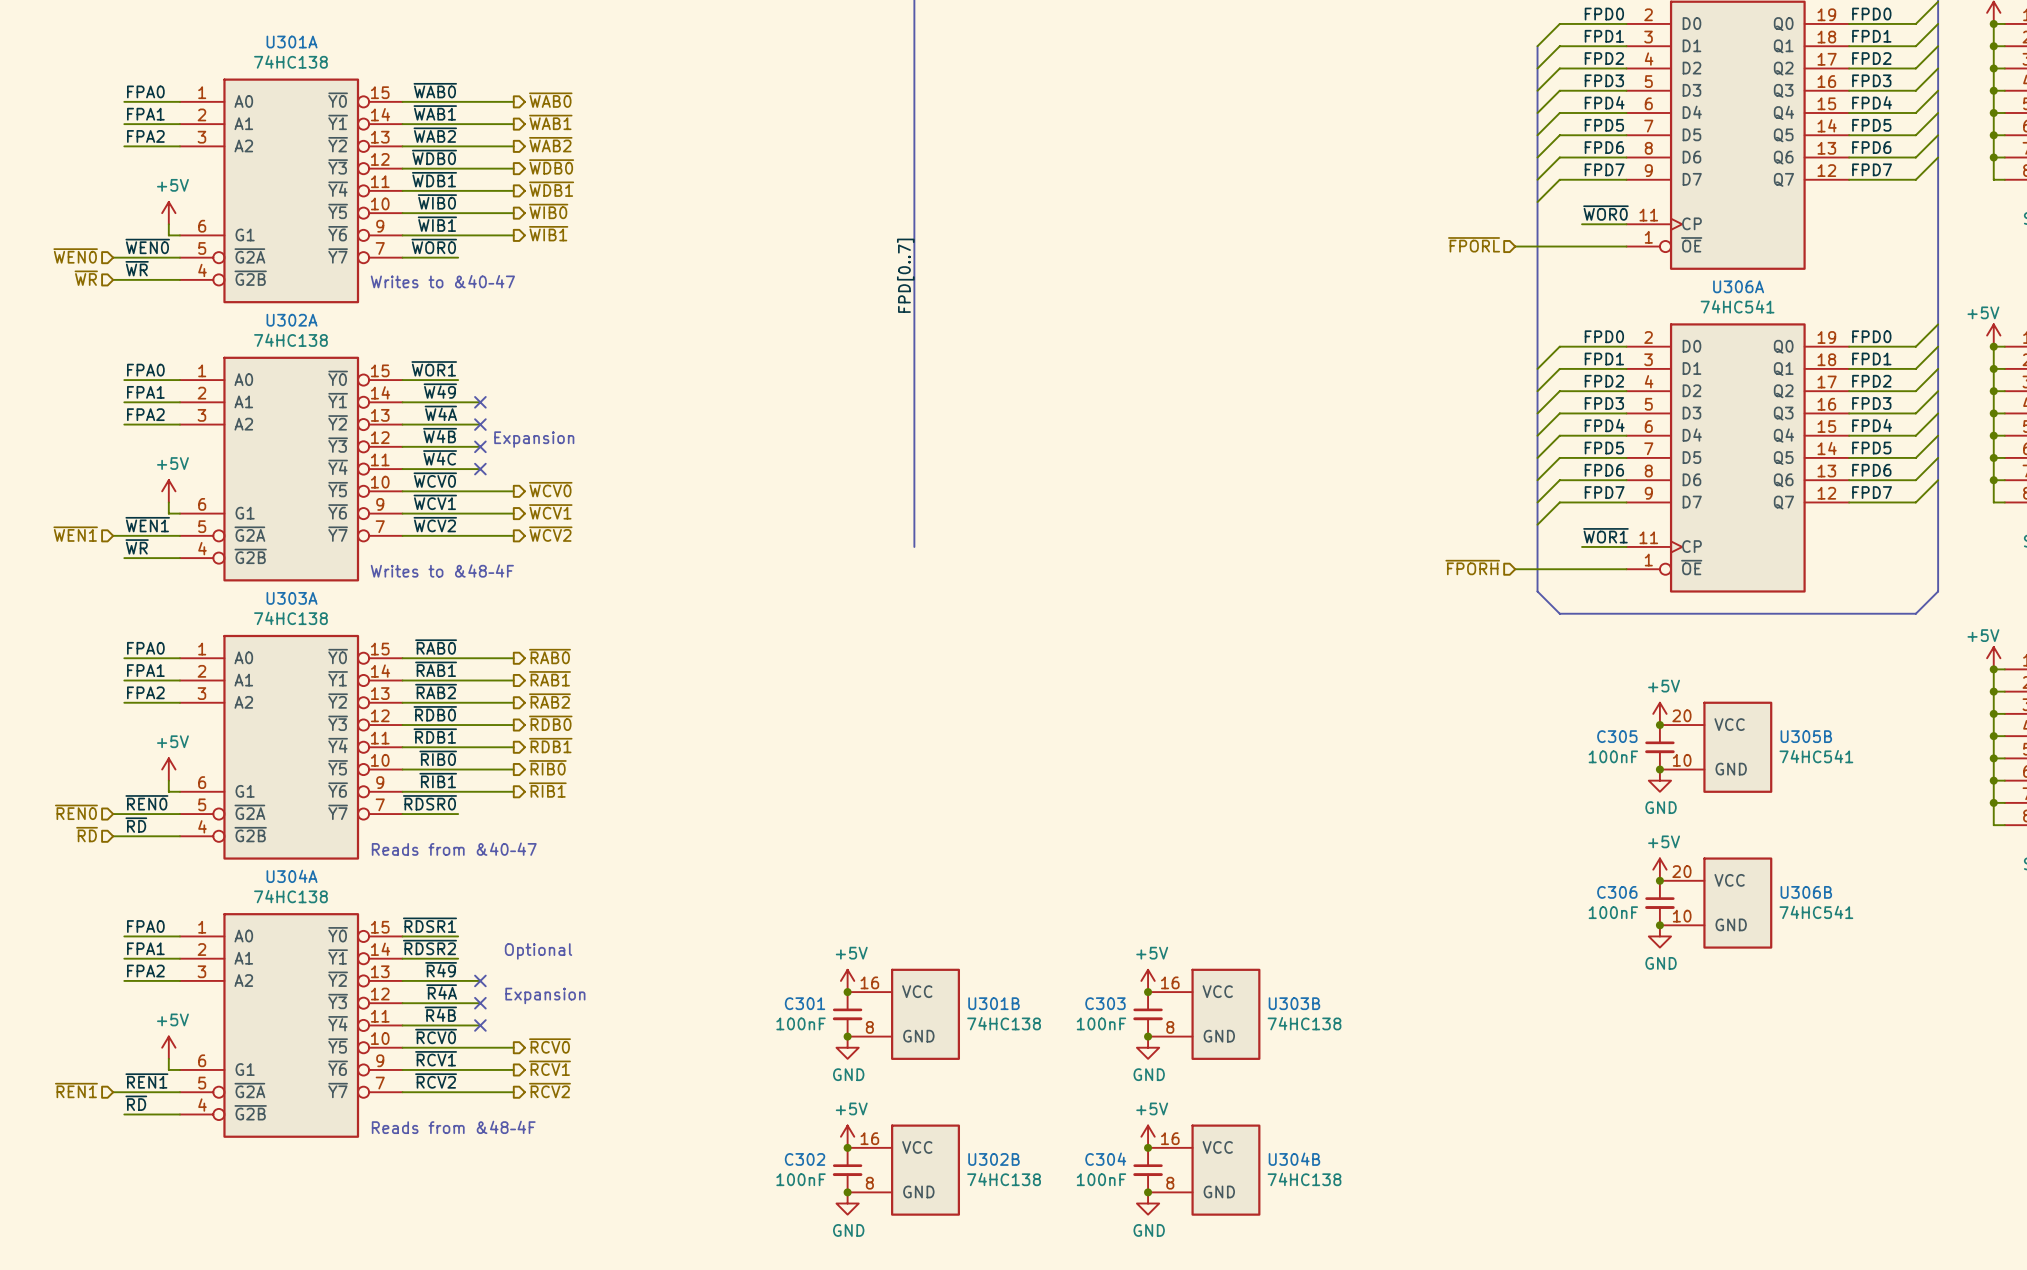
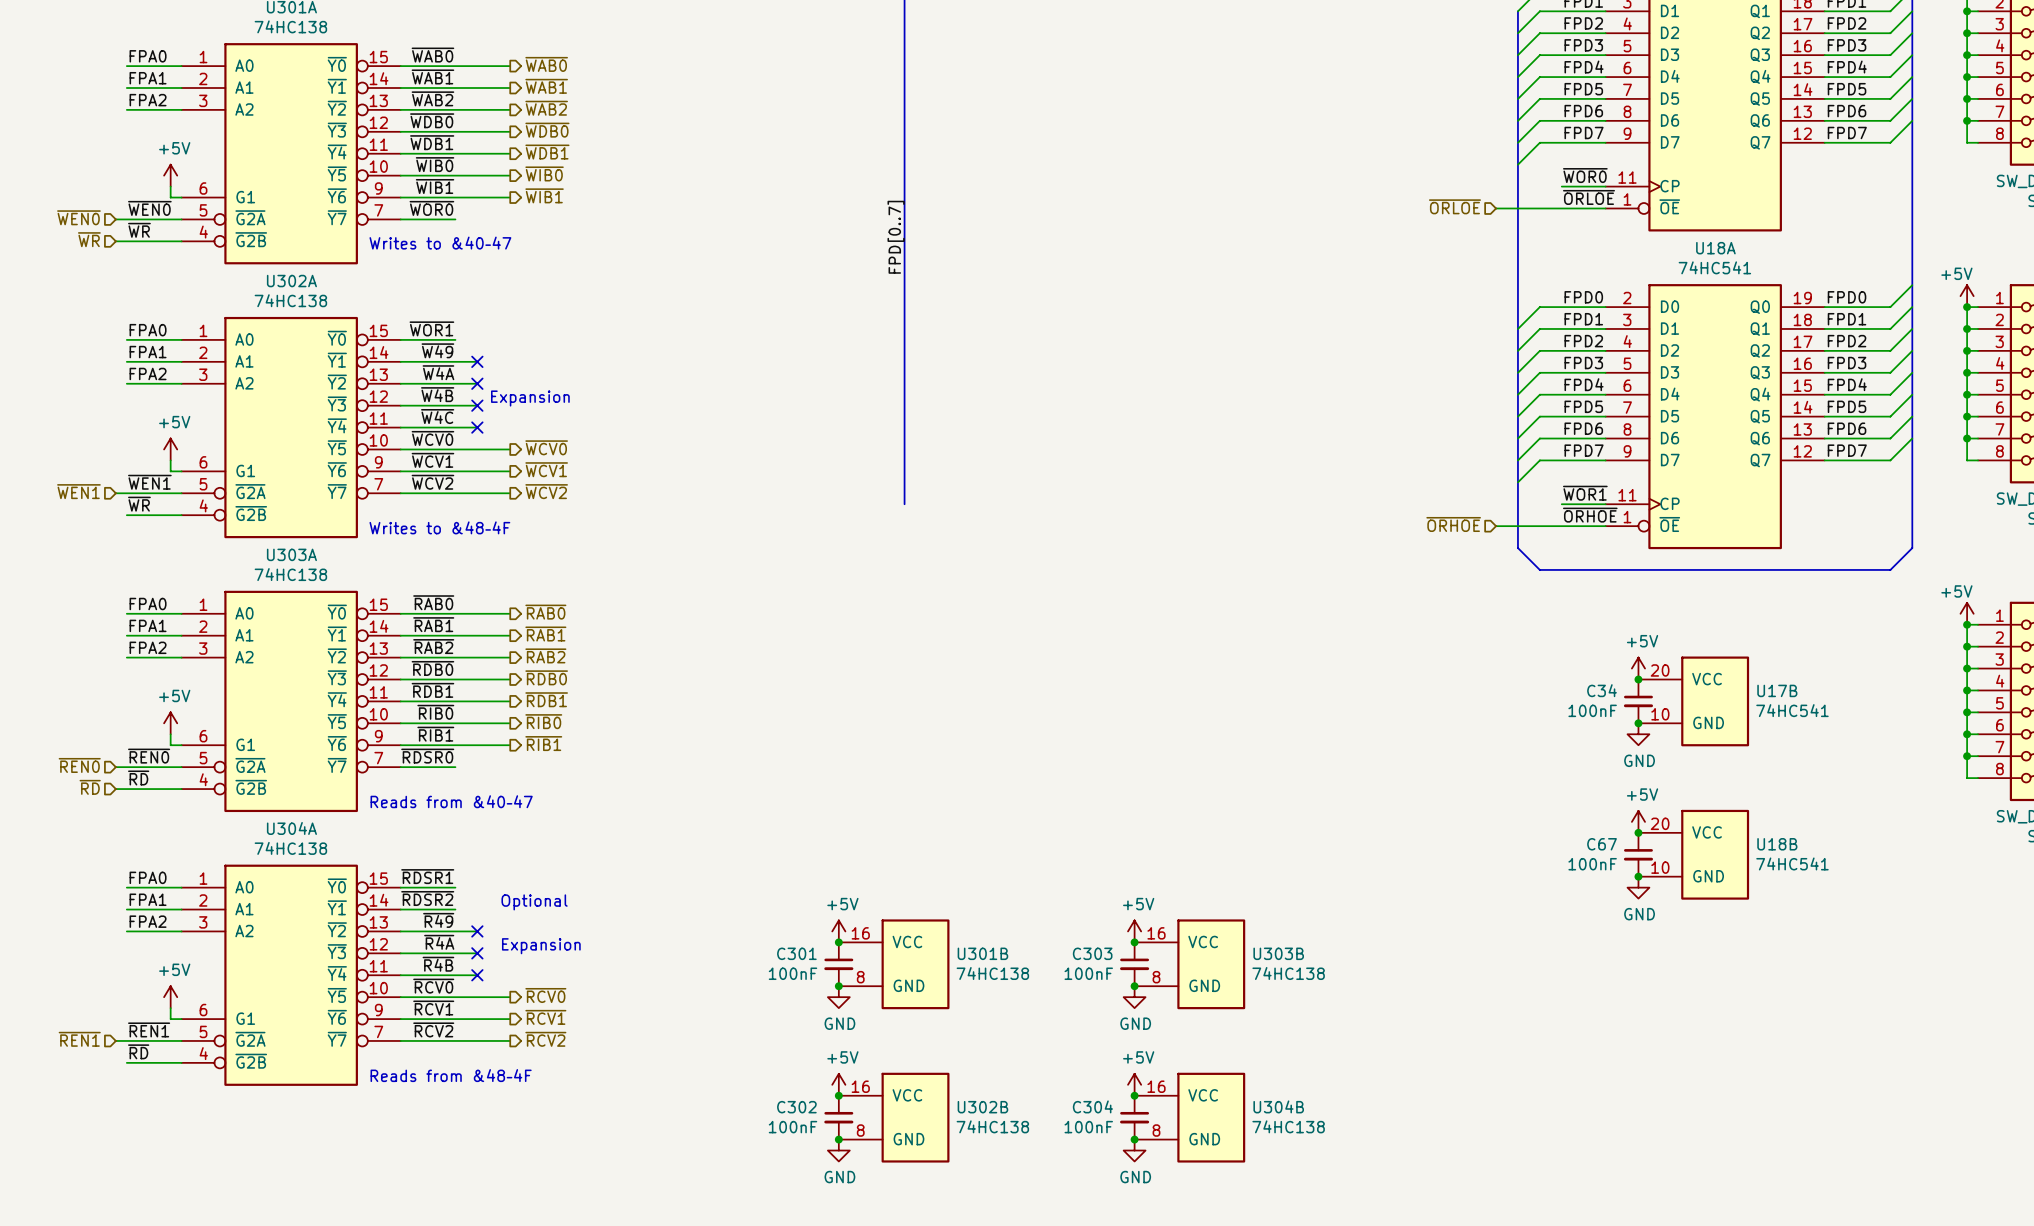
label: none -> ~{ORLOE} (1588, 197)
hierarchical label: ~{FPORL} (1474, 244) -> ~{ORLOE} (1454, 206)
U306A name: U306A (1738, 286) -> U18A (1715, 248)
label: none -> ~{ORHOE} (1590, 515)
hierarchical label: ~{FPORH} (1472, 567) -> ~{ORHOE} (1453, 524)
C305 name: C305 (1617, 736) -> C34 (1602, 690)
U305B name: U305B (1806, 736) -> U17B (1777, 690)
C306 name: C306 (1617, 892) -> C67 (1602, 844)
U306B name: U306B (1806, 892) -> U18B (1777, 844)

